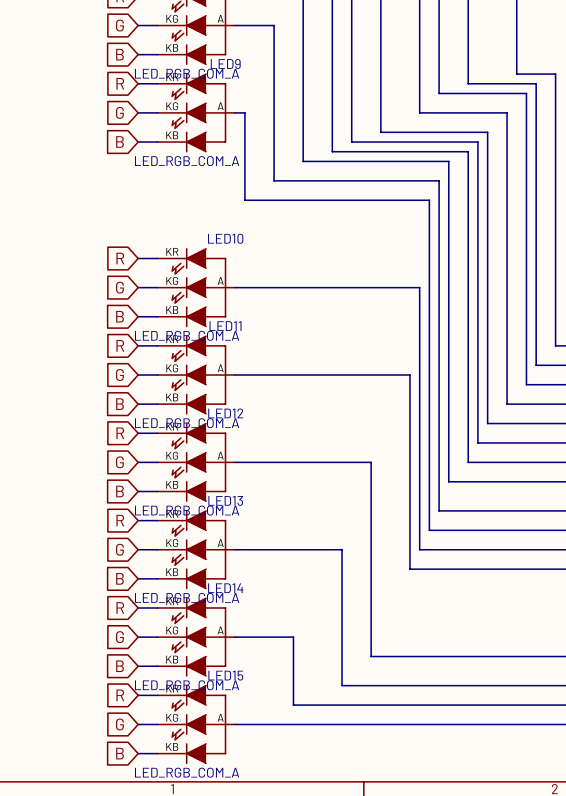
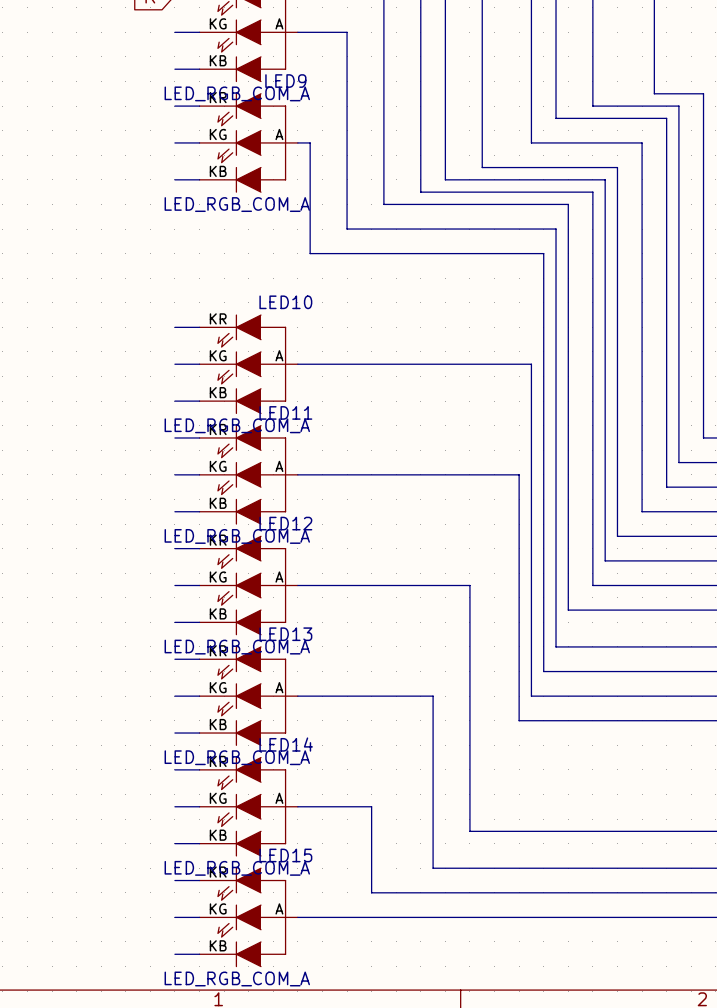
global label: G (119, 25) -> none
global label: B (120, 54) -> none
global label: R (120, 83) -> none
global label: G (119, 112) -> none
global label: B (120, 142) -> none
global label: R (120, 258) -> none
global label: G (119, 287) -> none
global label: B (120, 316) -> none
global label: R (120, 345) -> none
global label: G (119, 375) -> none
global label: B (120, 404) -> none
global label: R (120, 433) -> none
global label: G (119, 462) -> none
global label: B (120, 491) -> none
global label: R (120, 520) -> none
global label: G (119, 549) -> none
global label: B (120, 578) -> none
global label: R (120, 607) -> none
global label: G (119, 637) -> none
global label: B (120, 666) -> none
global label: R (120, 695) -> none
global label: G (119, 724) -> none
global label: B (120, 753) -> none

